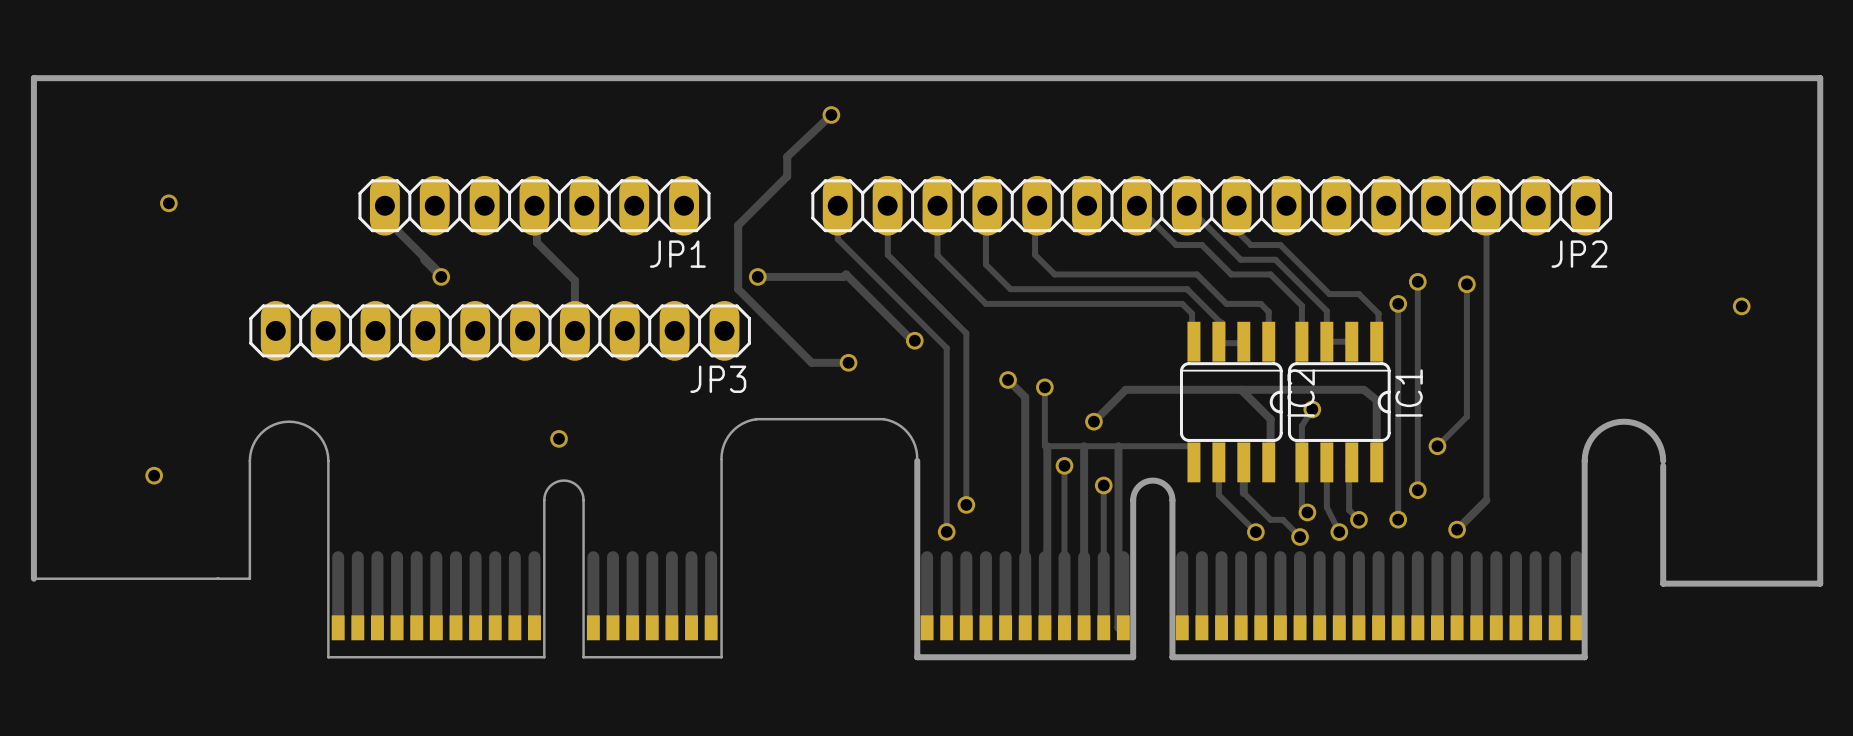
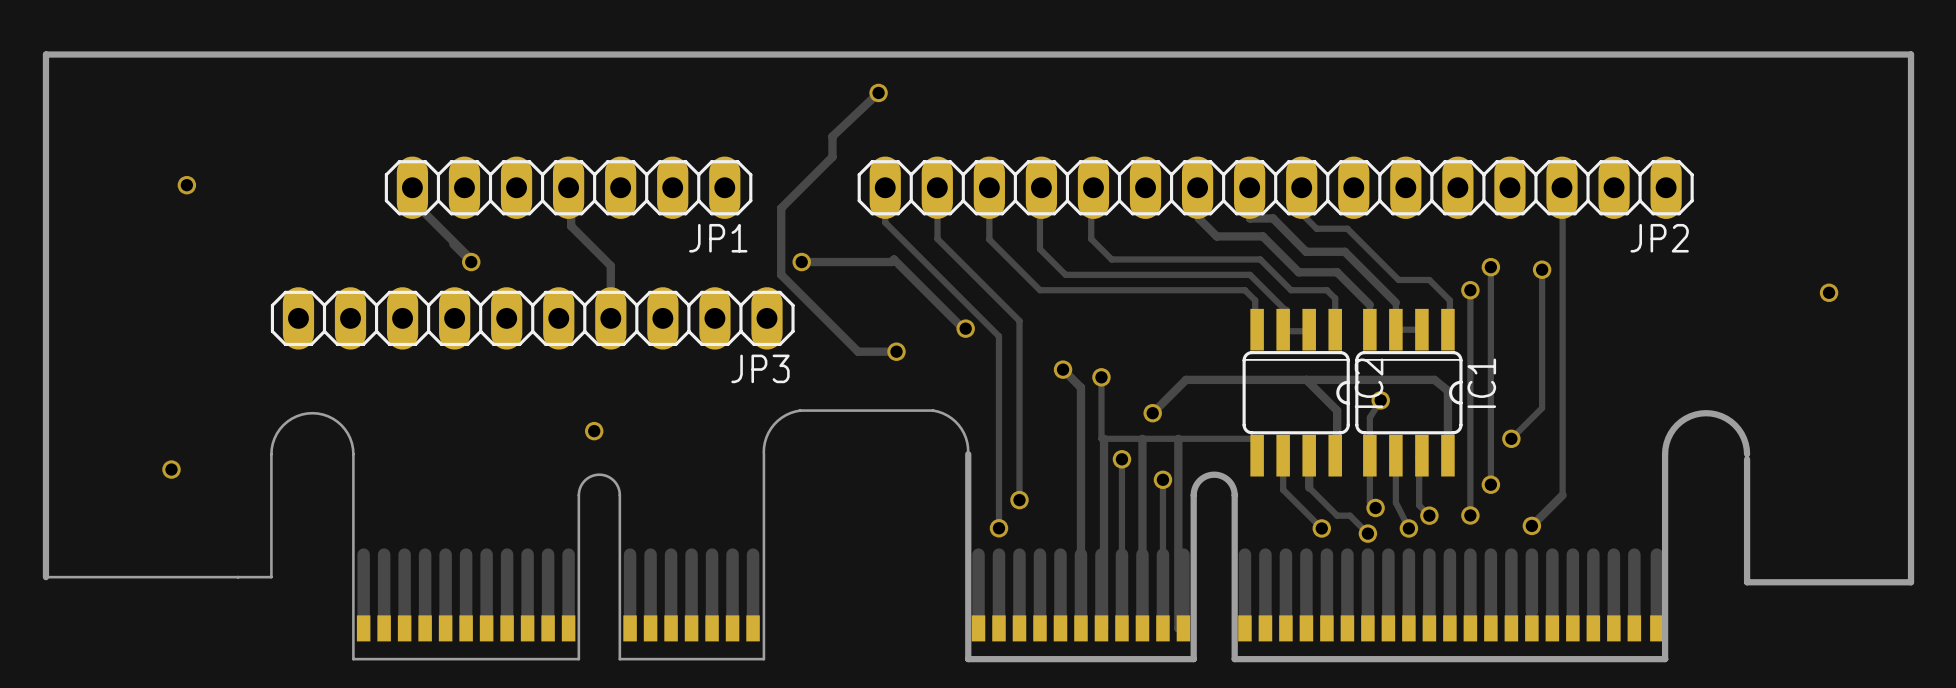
track: (1136, 205) (1176, 245) (1201, 245) (1231, 274) (1270, 274) (1301, 305) (1301, 318) -> (1197, 187) (1198, 218) (1216, 236) (1262, 236) (1298, 272) (1337, 272) (1369, 304)
track: (1186, 205) (1240, 259) (1275, 259) (1326, 311) (1326, 315) -> (1249, 187) (1250, 218) (1273, 218) (1306, 251) (1344, 251) (1395, 302)

